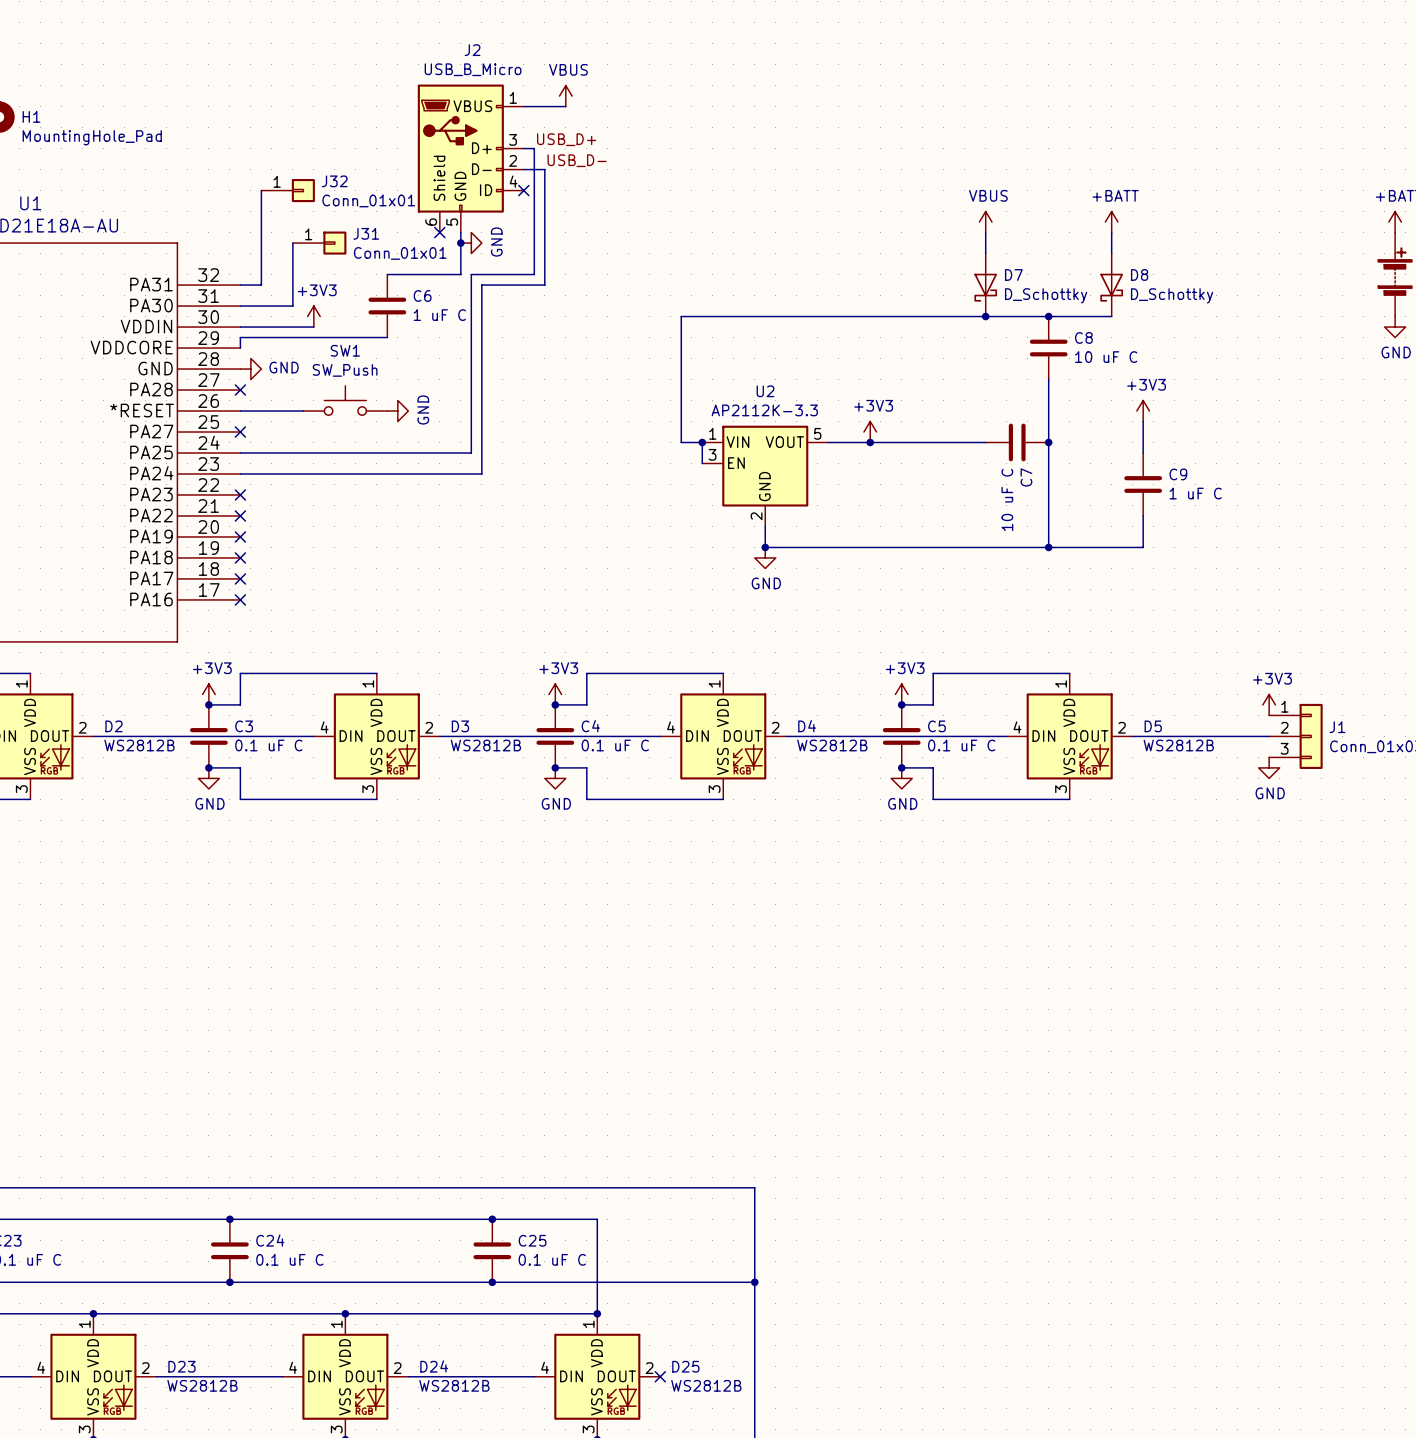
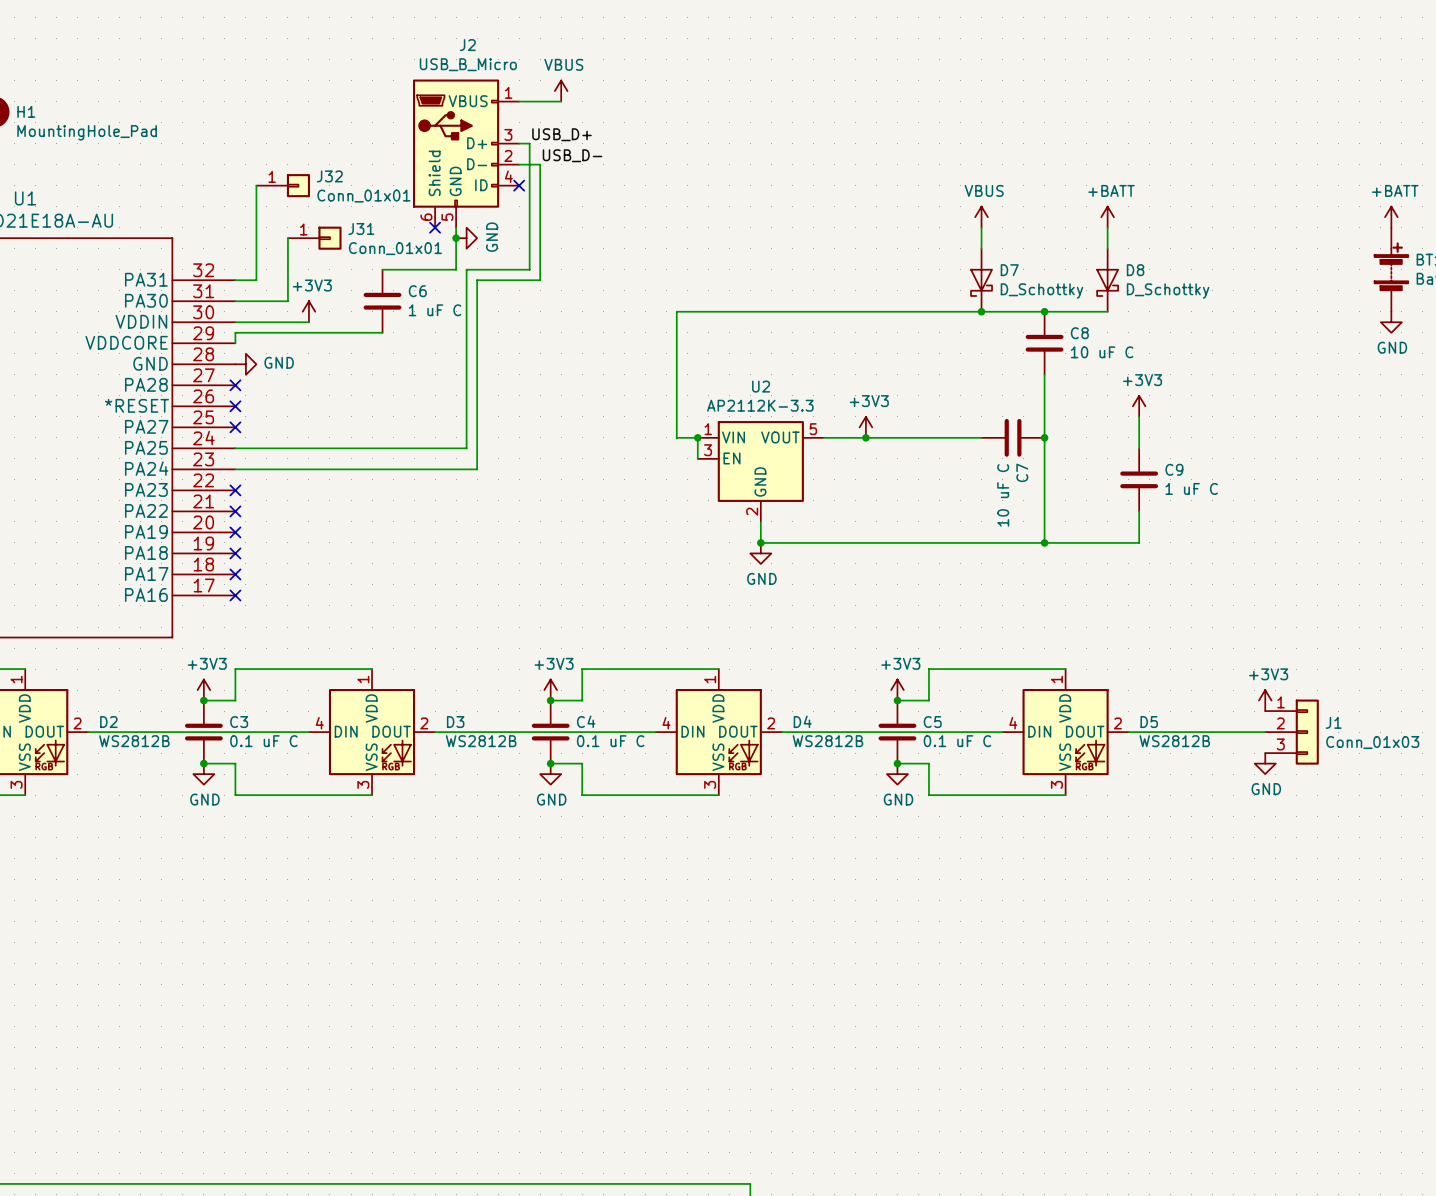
SW1: SW_Push (345, 400) -> none
wire: (240, 411) (303, 411) -> none
no-connect mark: none -> (235, 406)
power symbol: GND (397, 411) -> none

